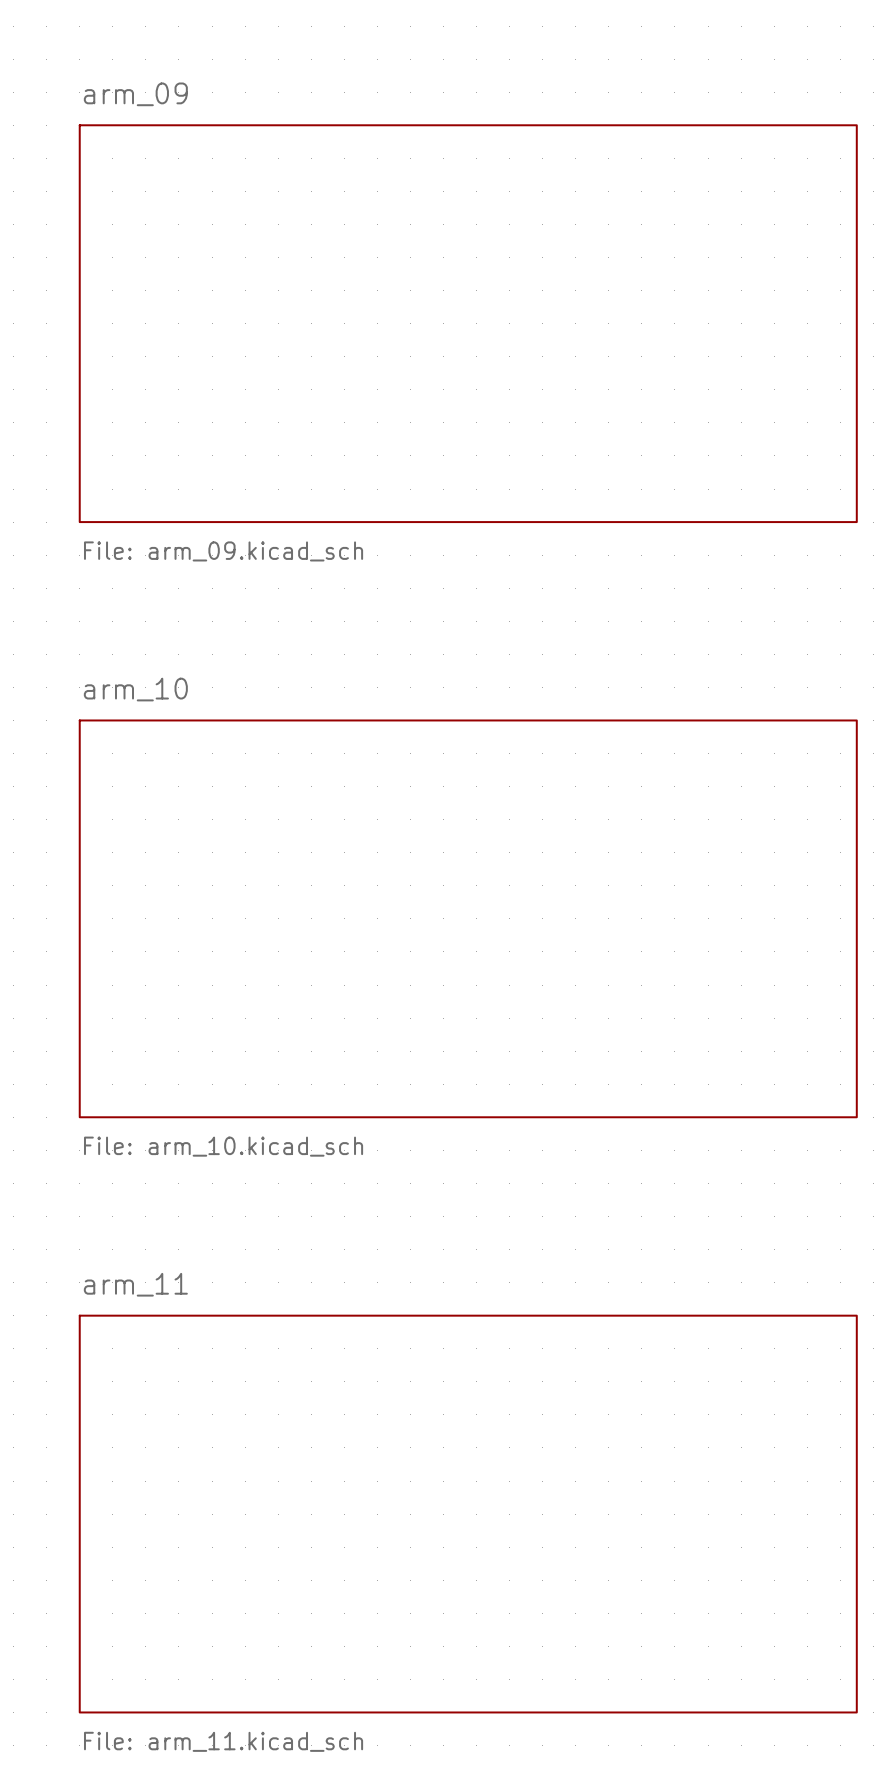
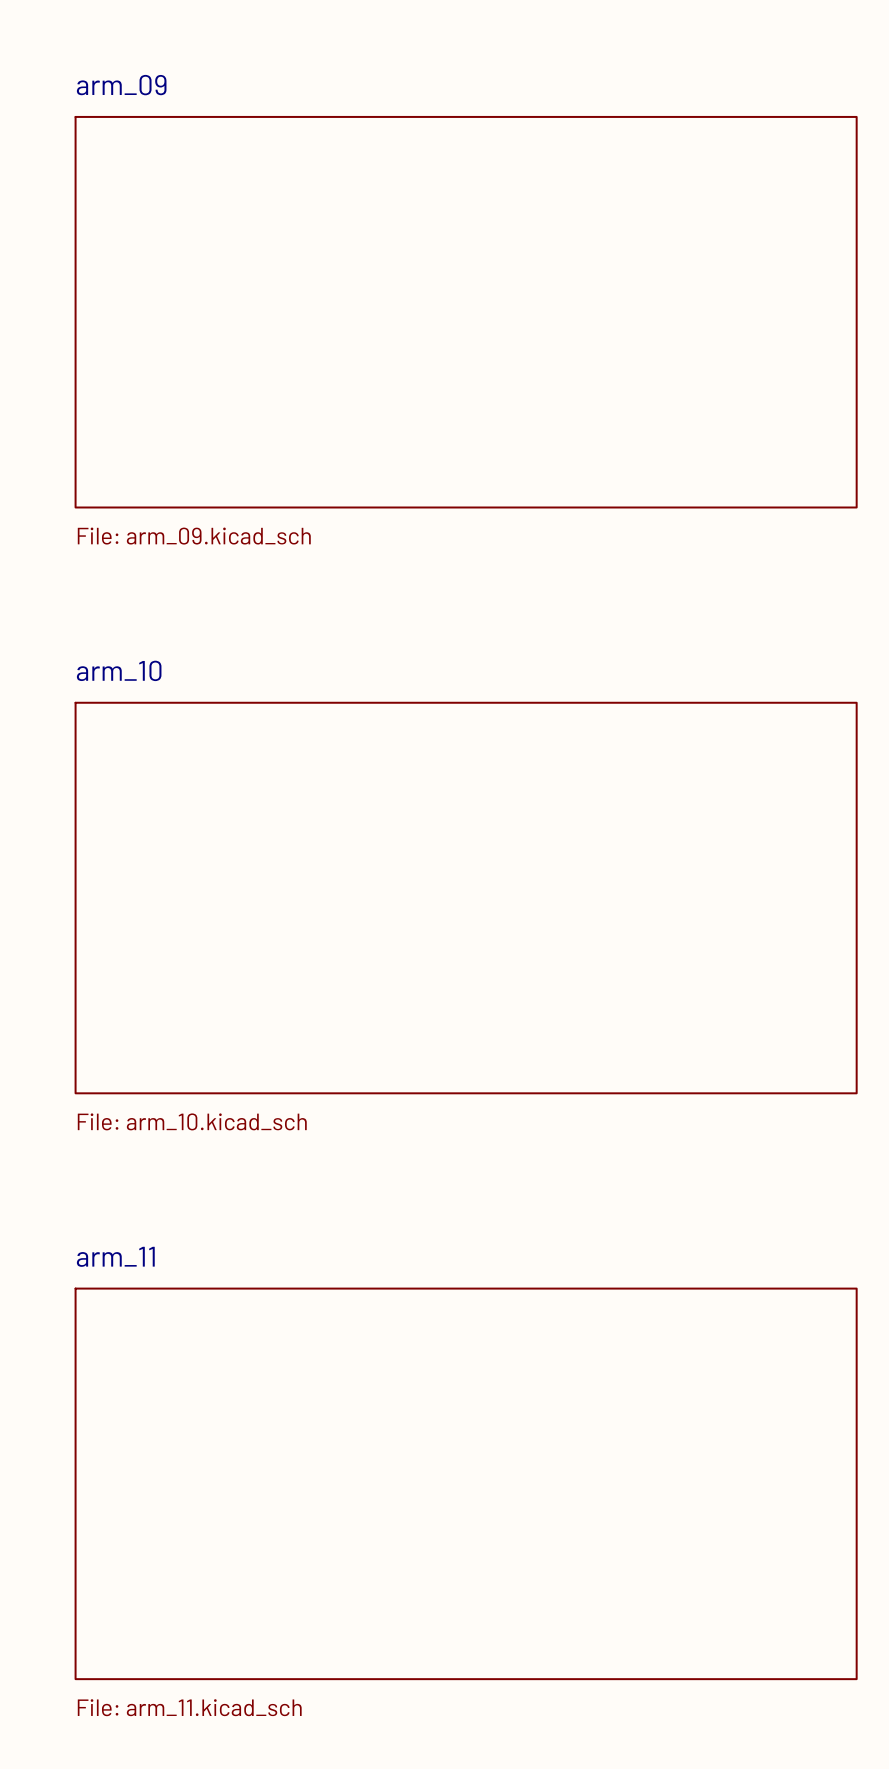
sheet arm_09 shape: [78, 124, 858, 524] -> [74, 115, 858, 509]
sheet arm_10 shape: [78, 719, 858, 1119] -> [74, 701, 858, 1095]
sheet arm_11 shape: [78, 1314, 858, 1714] -> [74, 1287, 858, 1681]

